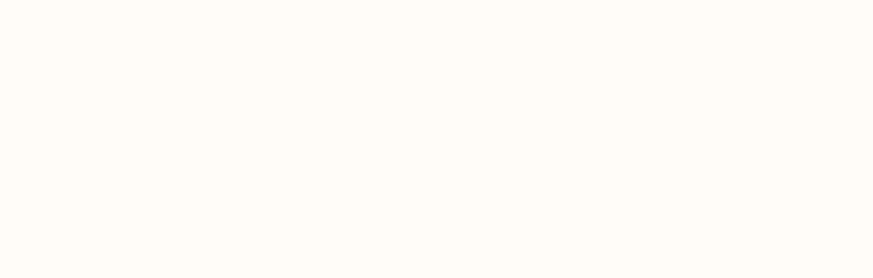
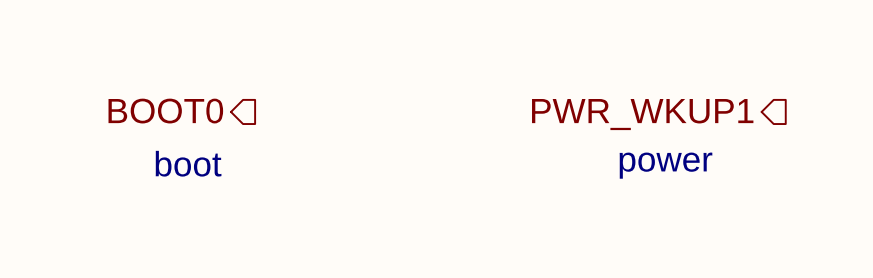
hierarchical label: none -> BOOT0 (165, 111)
hierarchical label: none -> PWR_WKUP1 (642, 114)
text: none -> boot (188, 163)
text: none -> power (665, 165)

